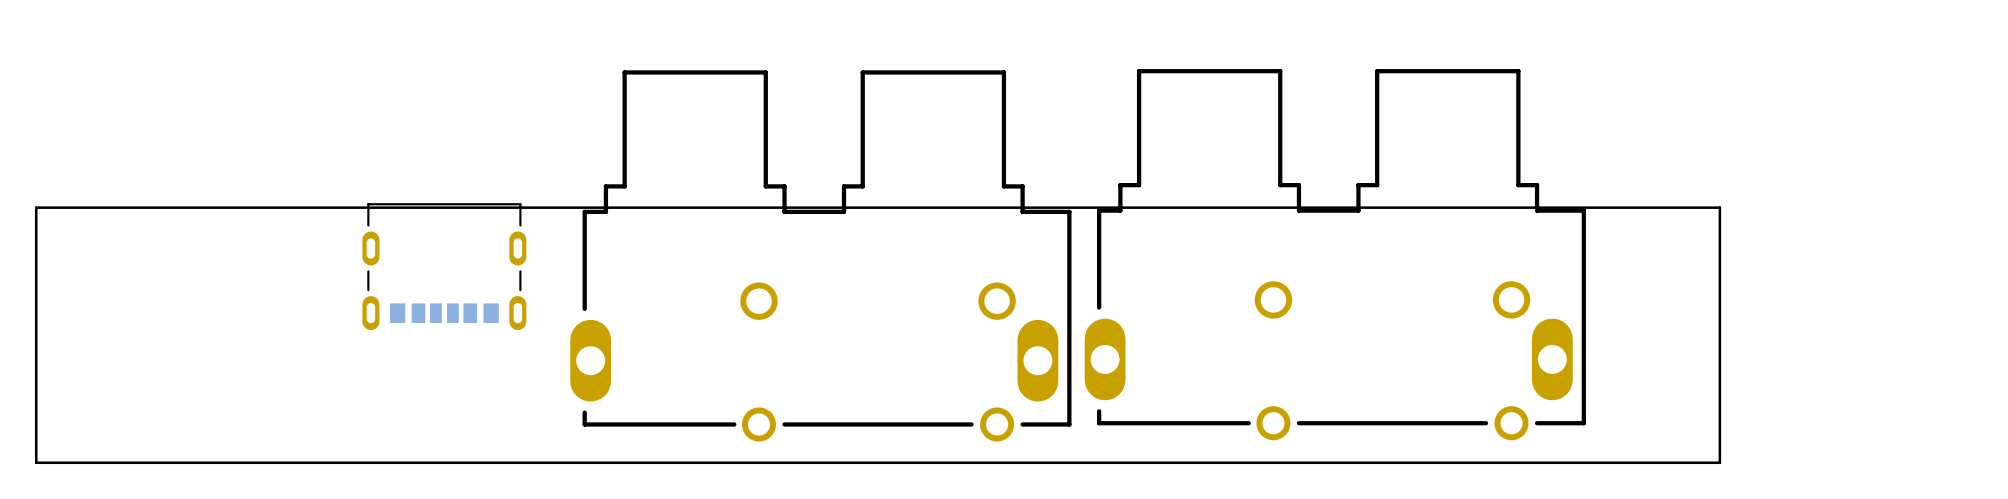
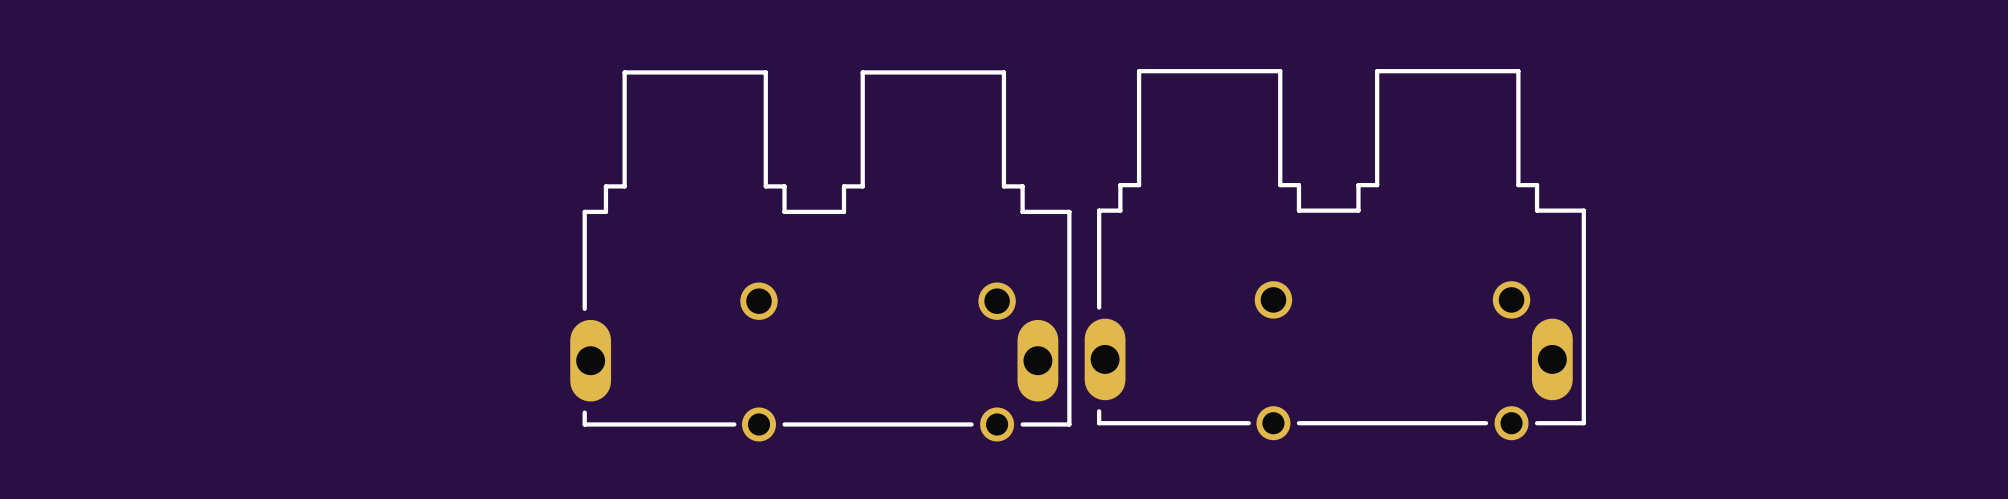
board edge: (1719, 207) (36, 207) (36, 462) (1719, 462) (1719, 207) -> none
part: (444, 266) -> none

